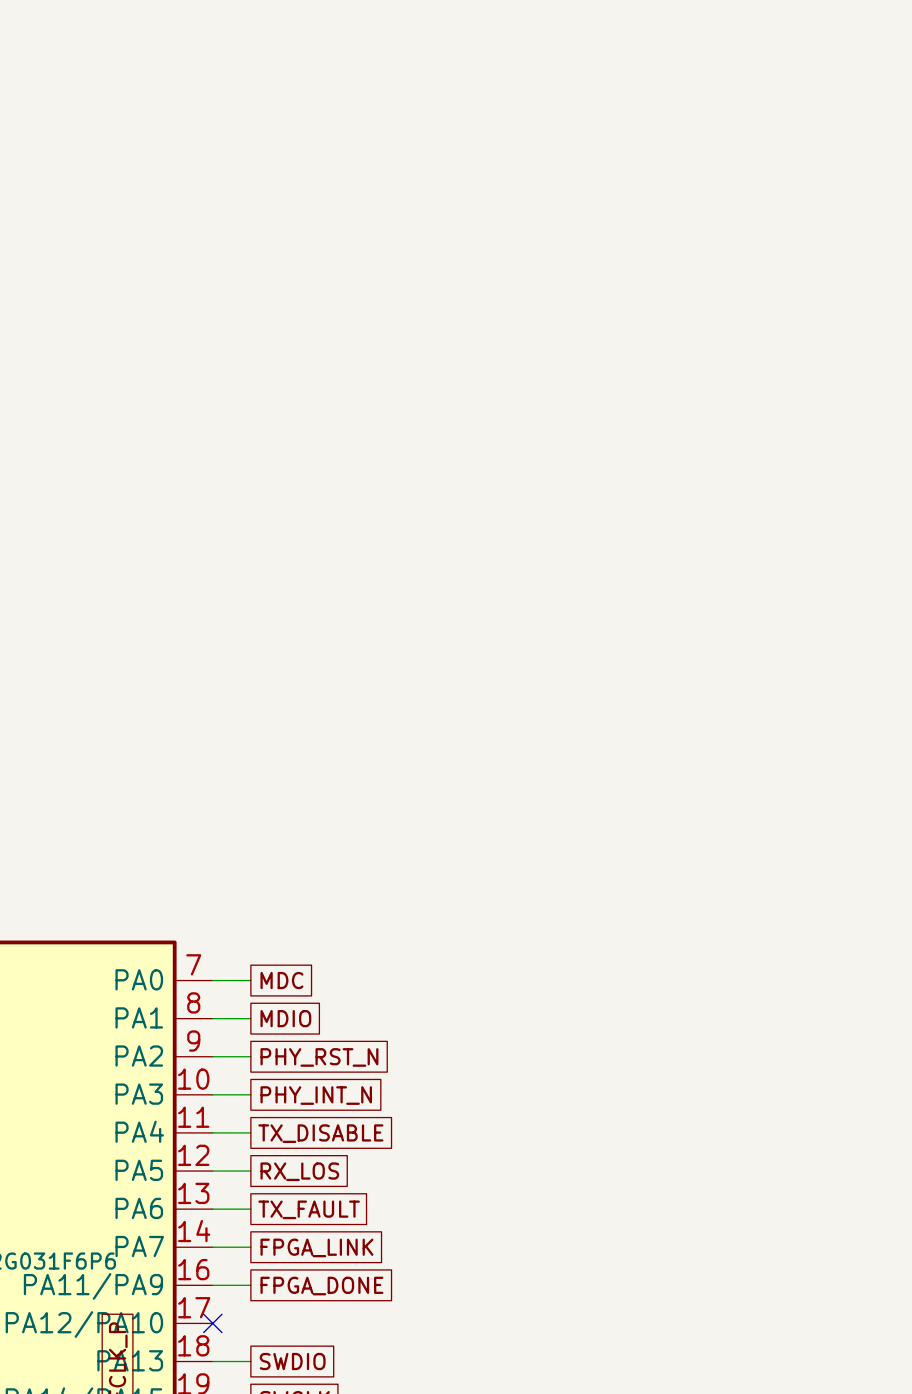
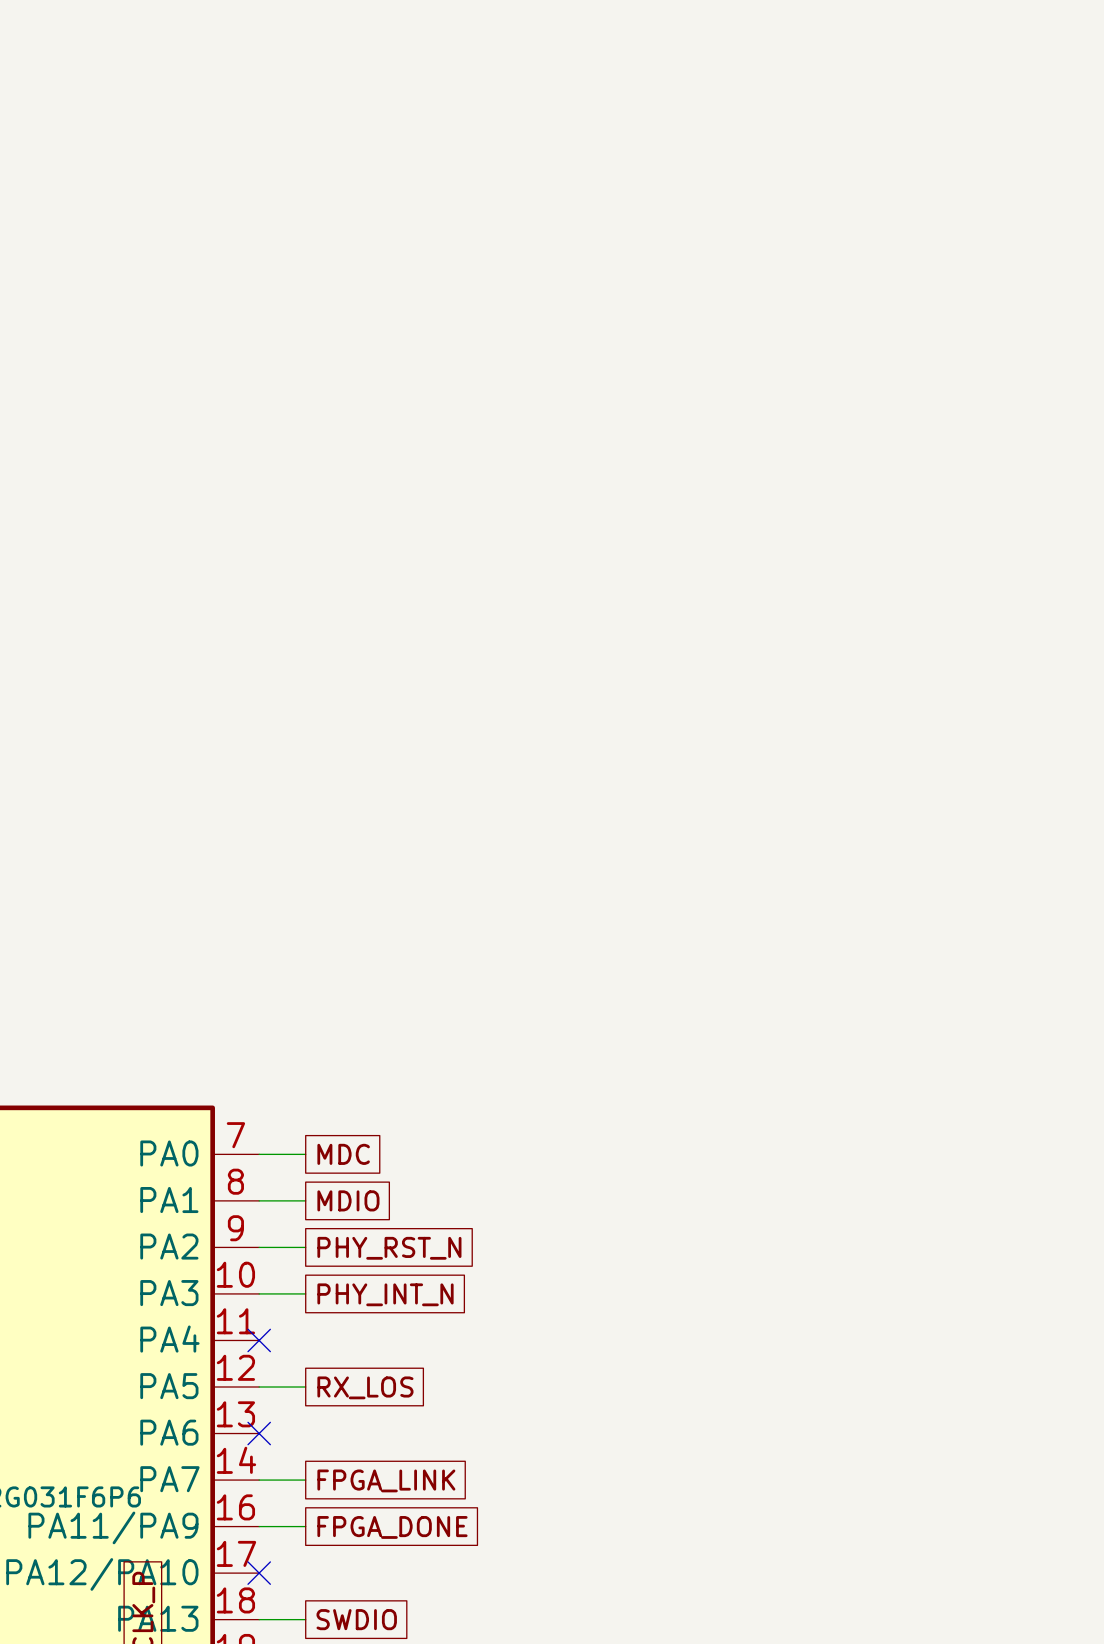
wire: (212, 1132) (250, 1132) -> none
no-connect mark: none -> (259, 1340)
global label: TX_DISABLE (320, 1133) -> none
wire: (212, 1209) (250, 1209) -> none
no-connect mark: none -> (259, 1433)
global label: TX_FAULT (309, 1209) -> none

